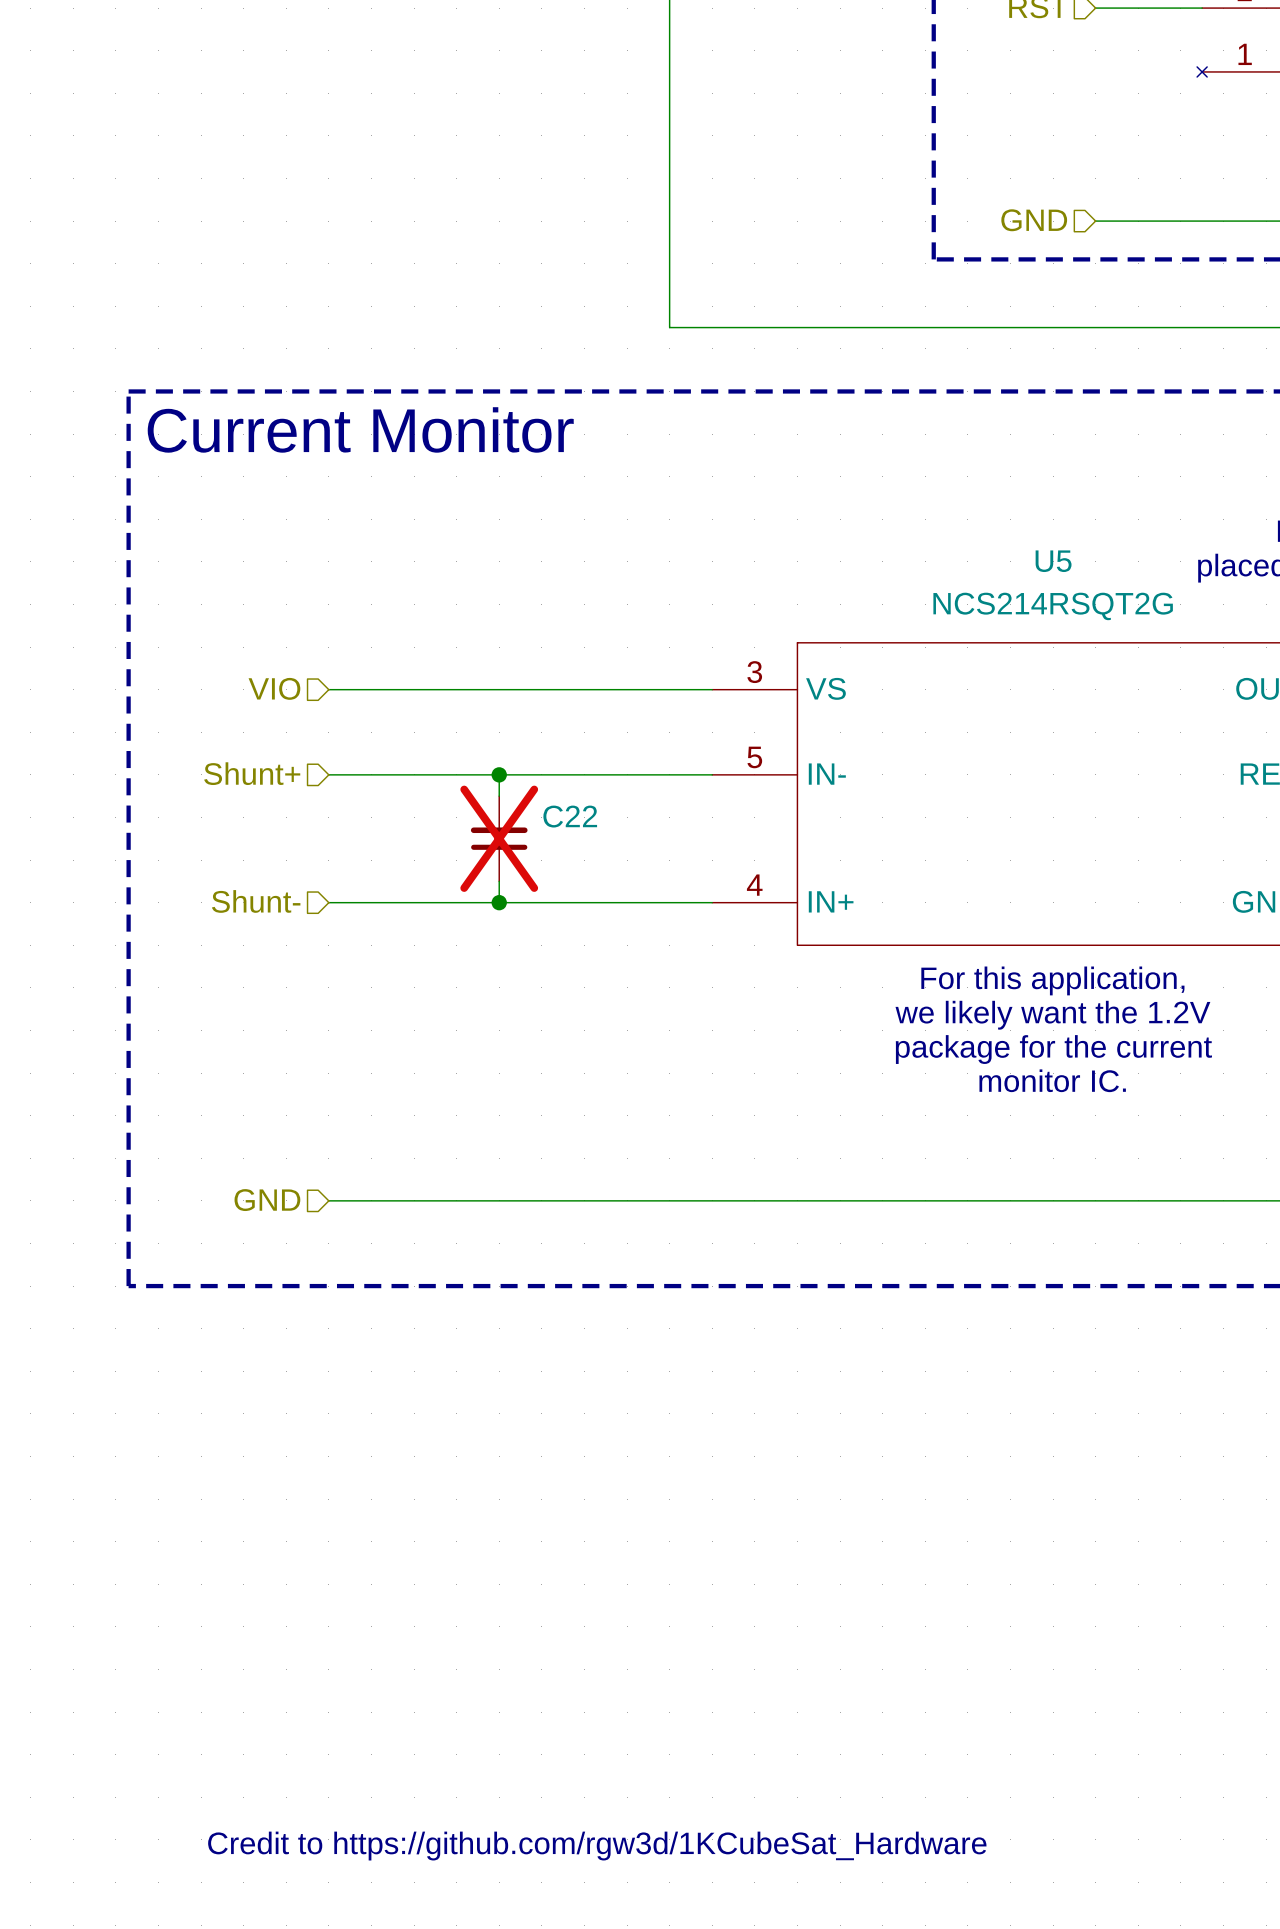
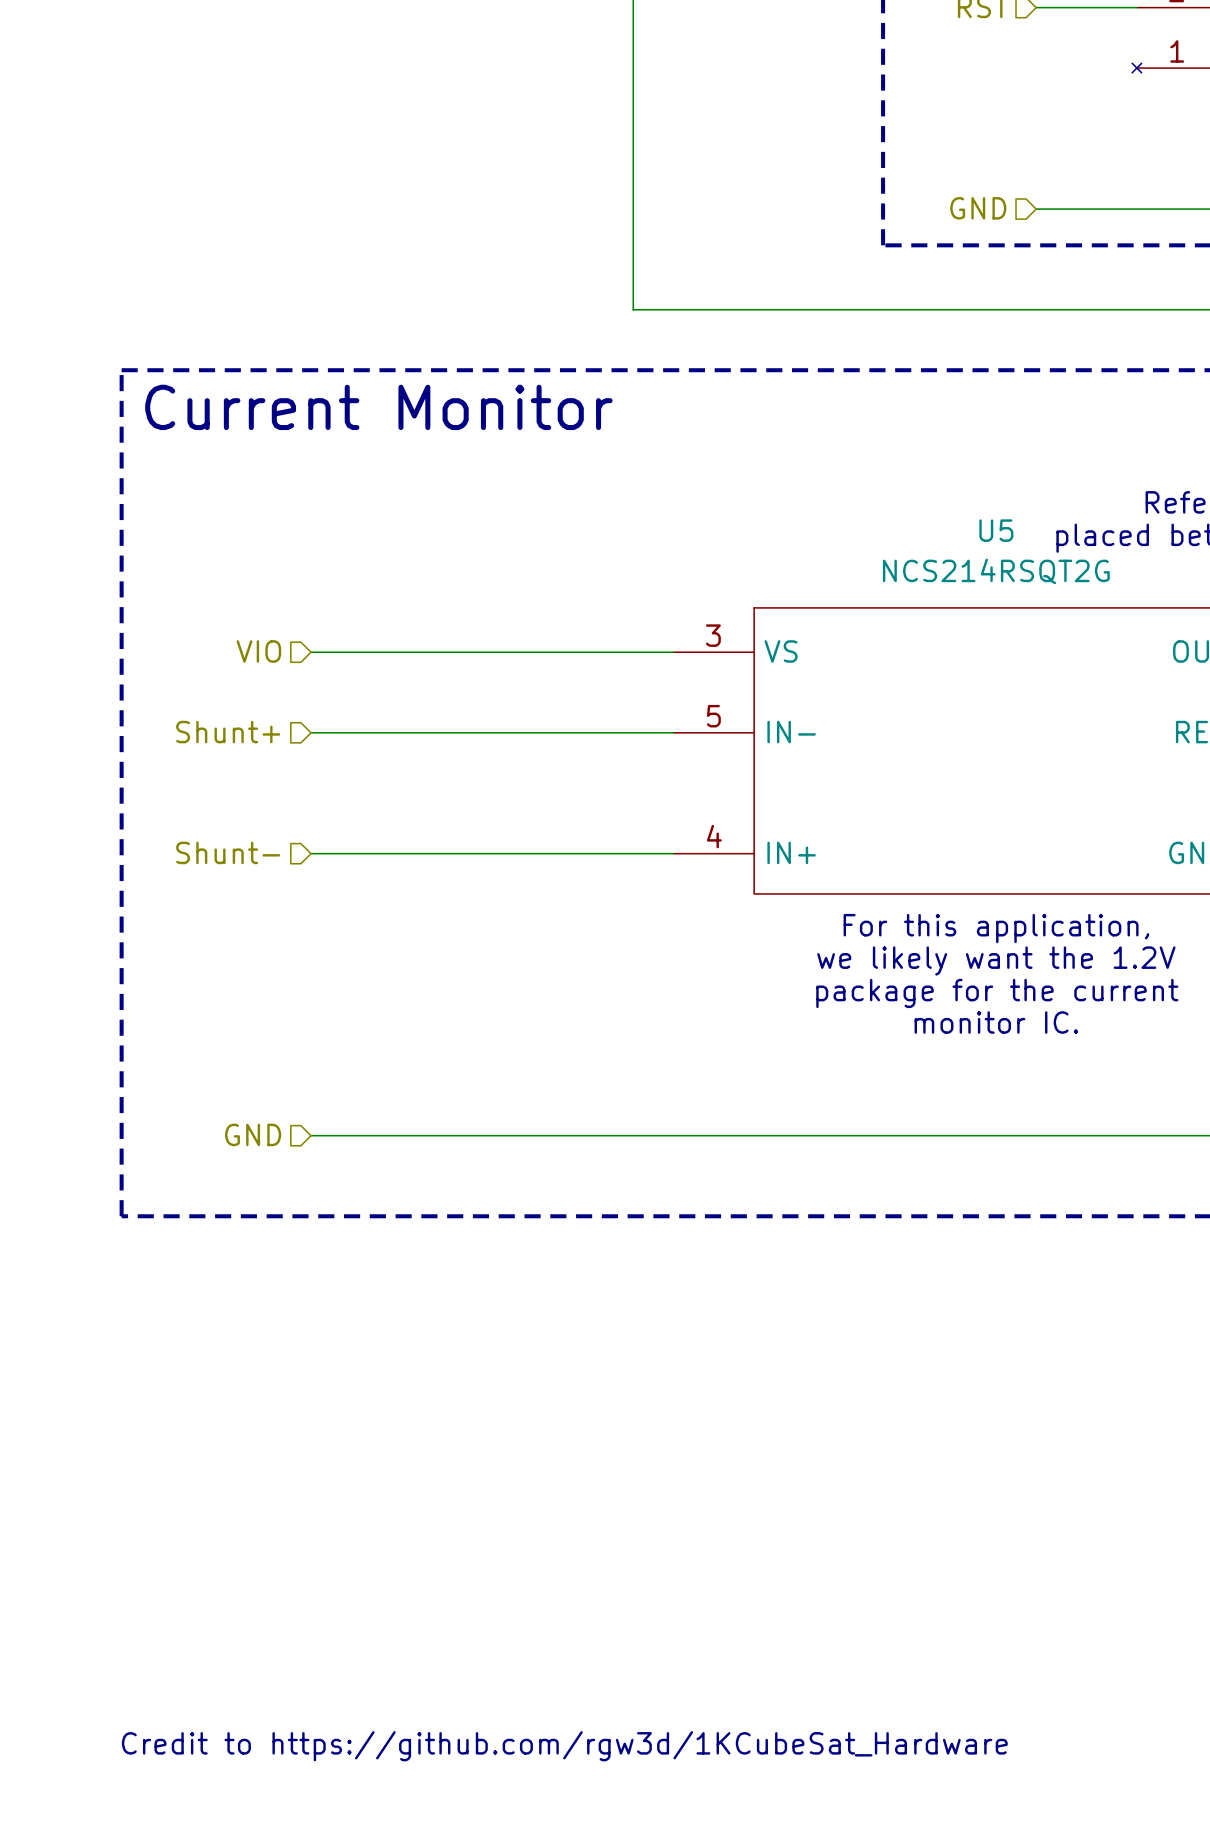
wire: (499, 774) (499, 796) -> none
junction: (499, 774) -> none
C22: (499, 838) -> none
wire: (499, 881) (499, 902) -> none
junction: (499, 902) -> none

